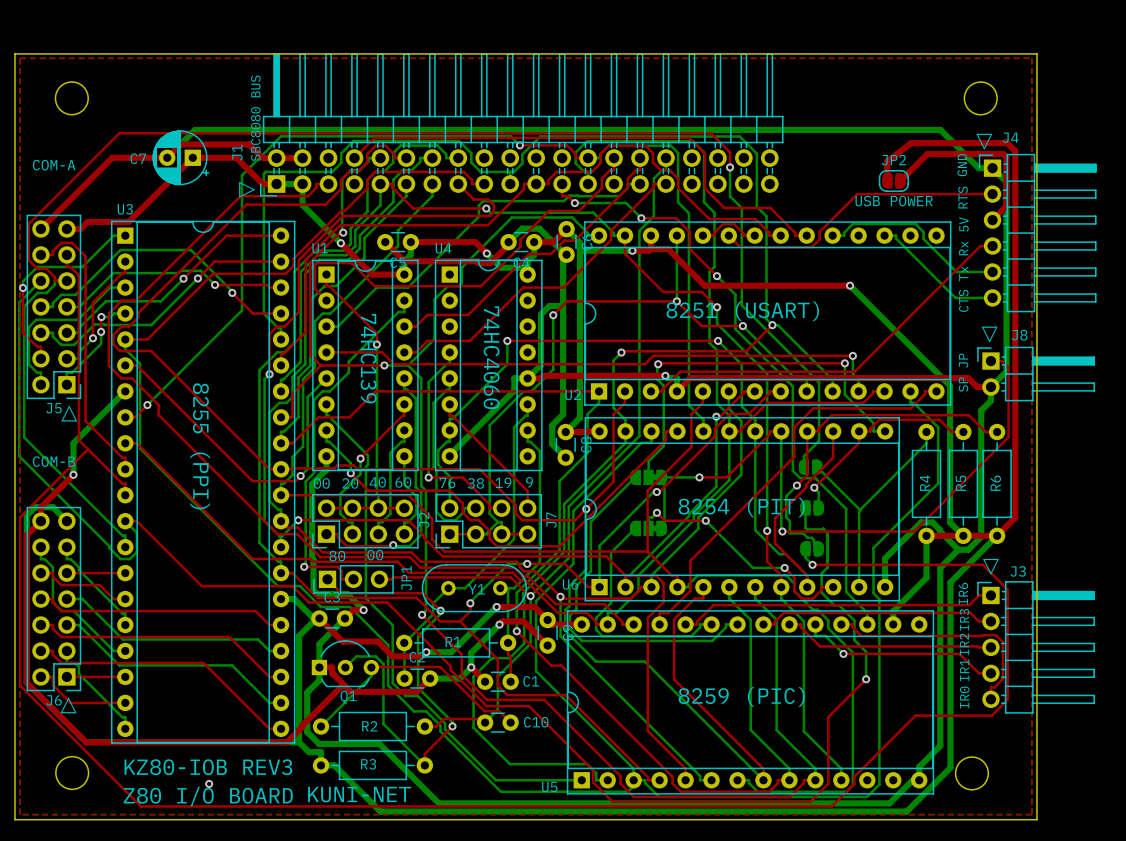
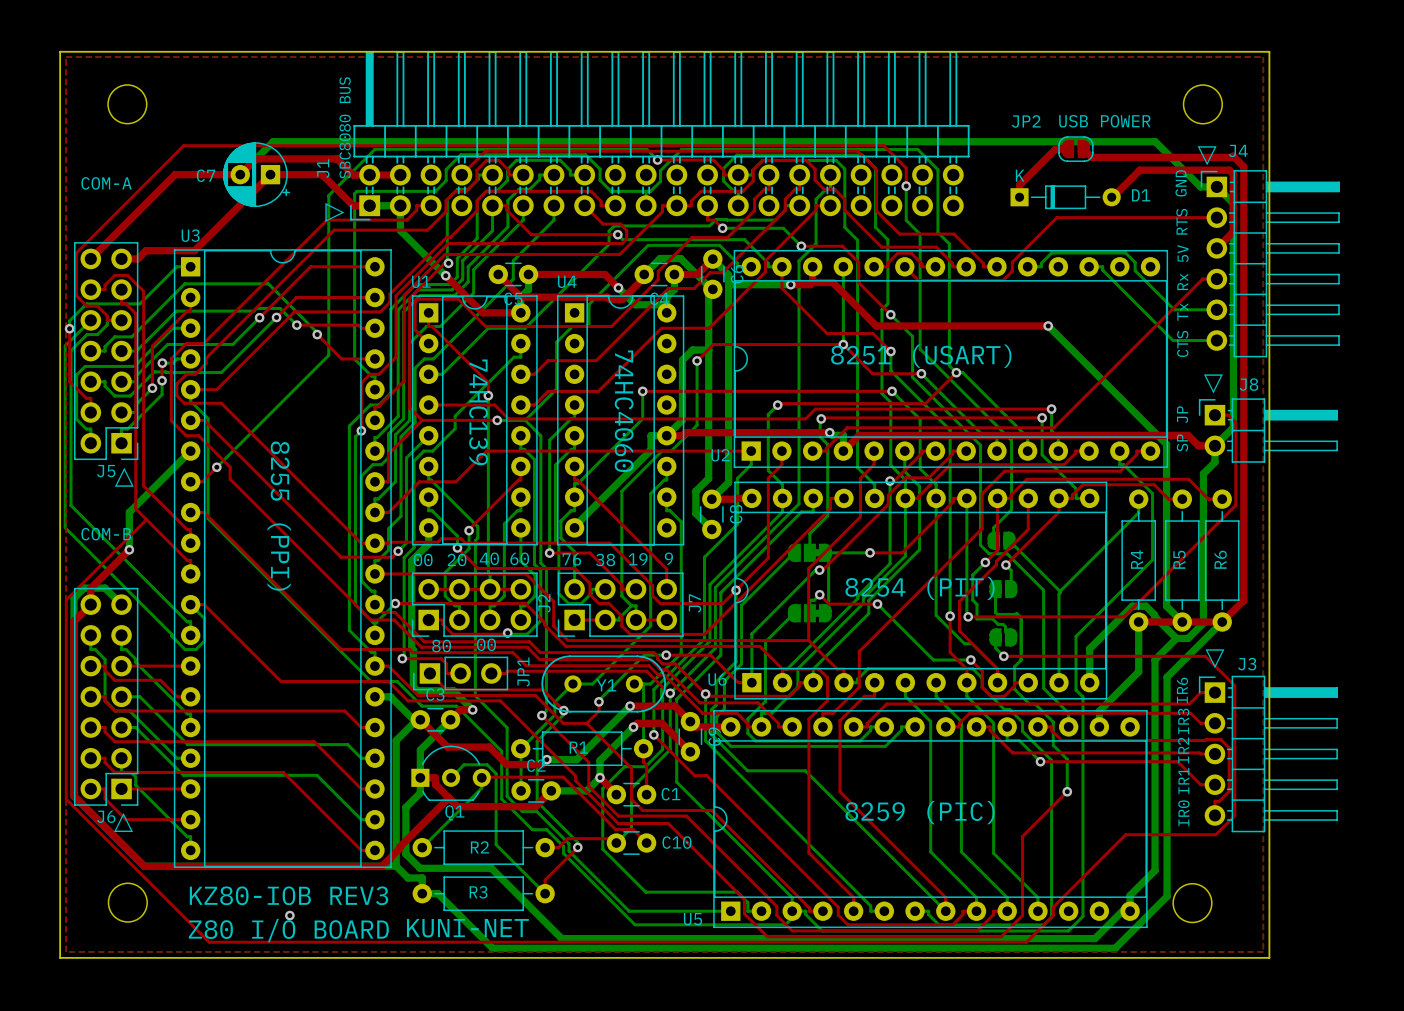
top track: none -> (1068, 149) (1055, 149) (1019, 185) (1019, 197)
top track: (911, 143) (887, 161) (887, 180) -> (1120, 157) (1091, 157) (1083, 149)
JP2 name position: JP2 (893, 160) -> JP2 (1026, 121)
D1: none -> (1065, 197)
JP2 position: (893, 180) -> (1075, 149)
text position: USB POWER (894, 201) -> USB POWER (1104, 121)

